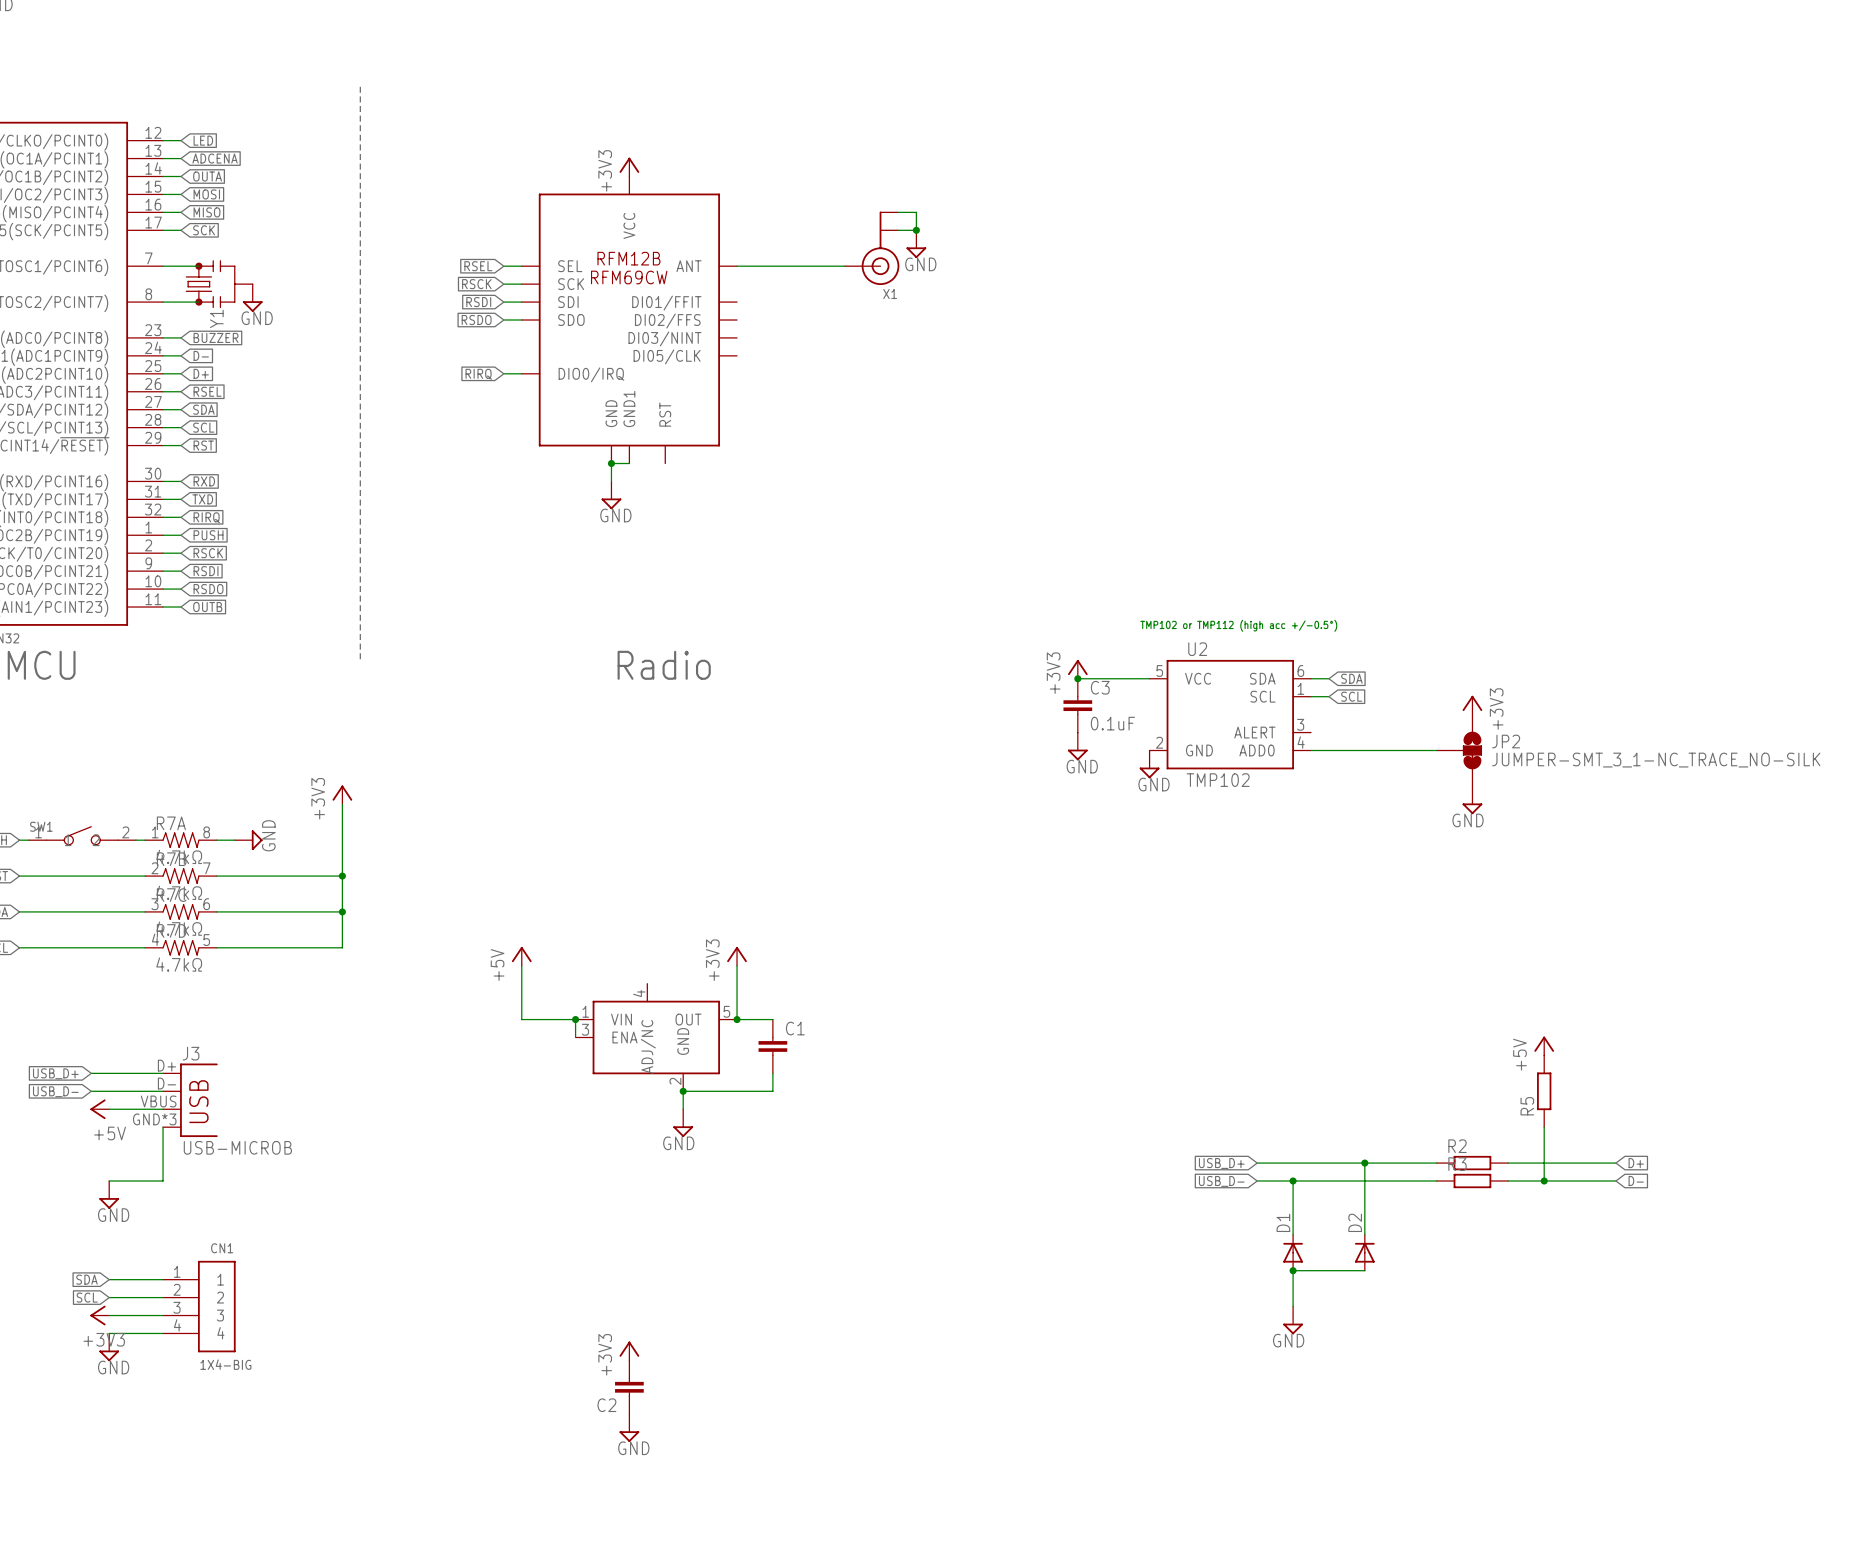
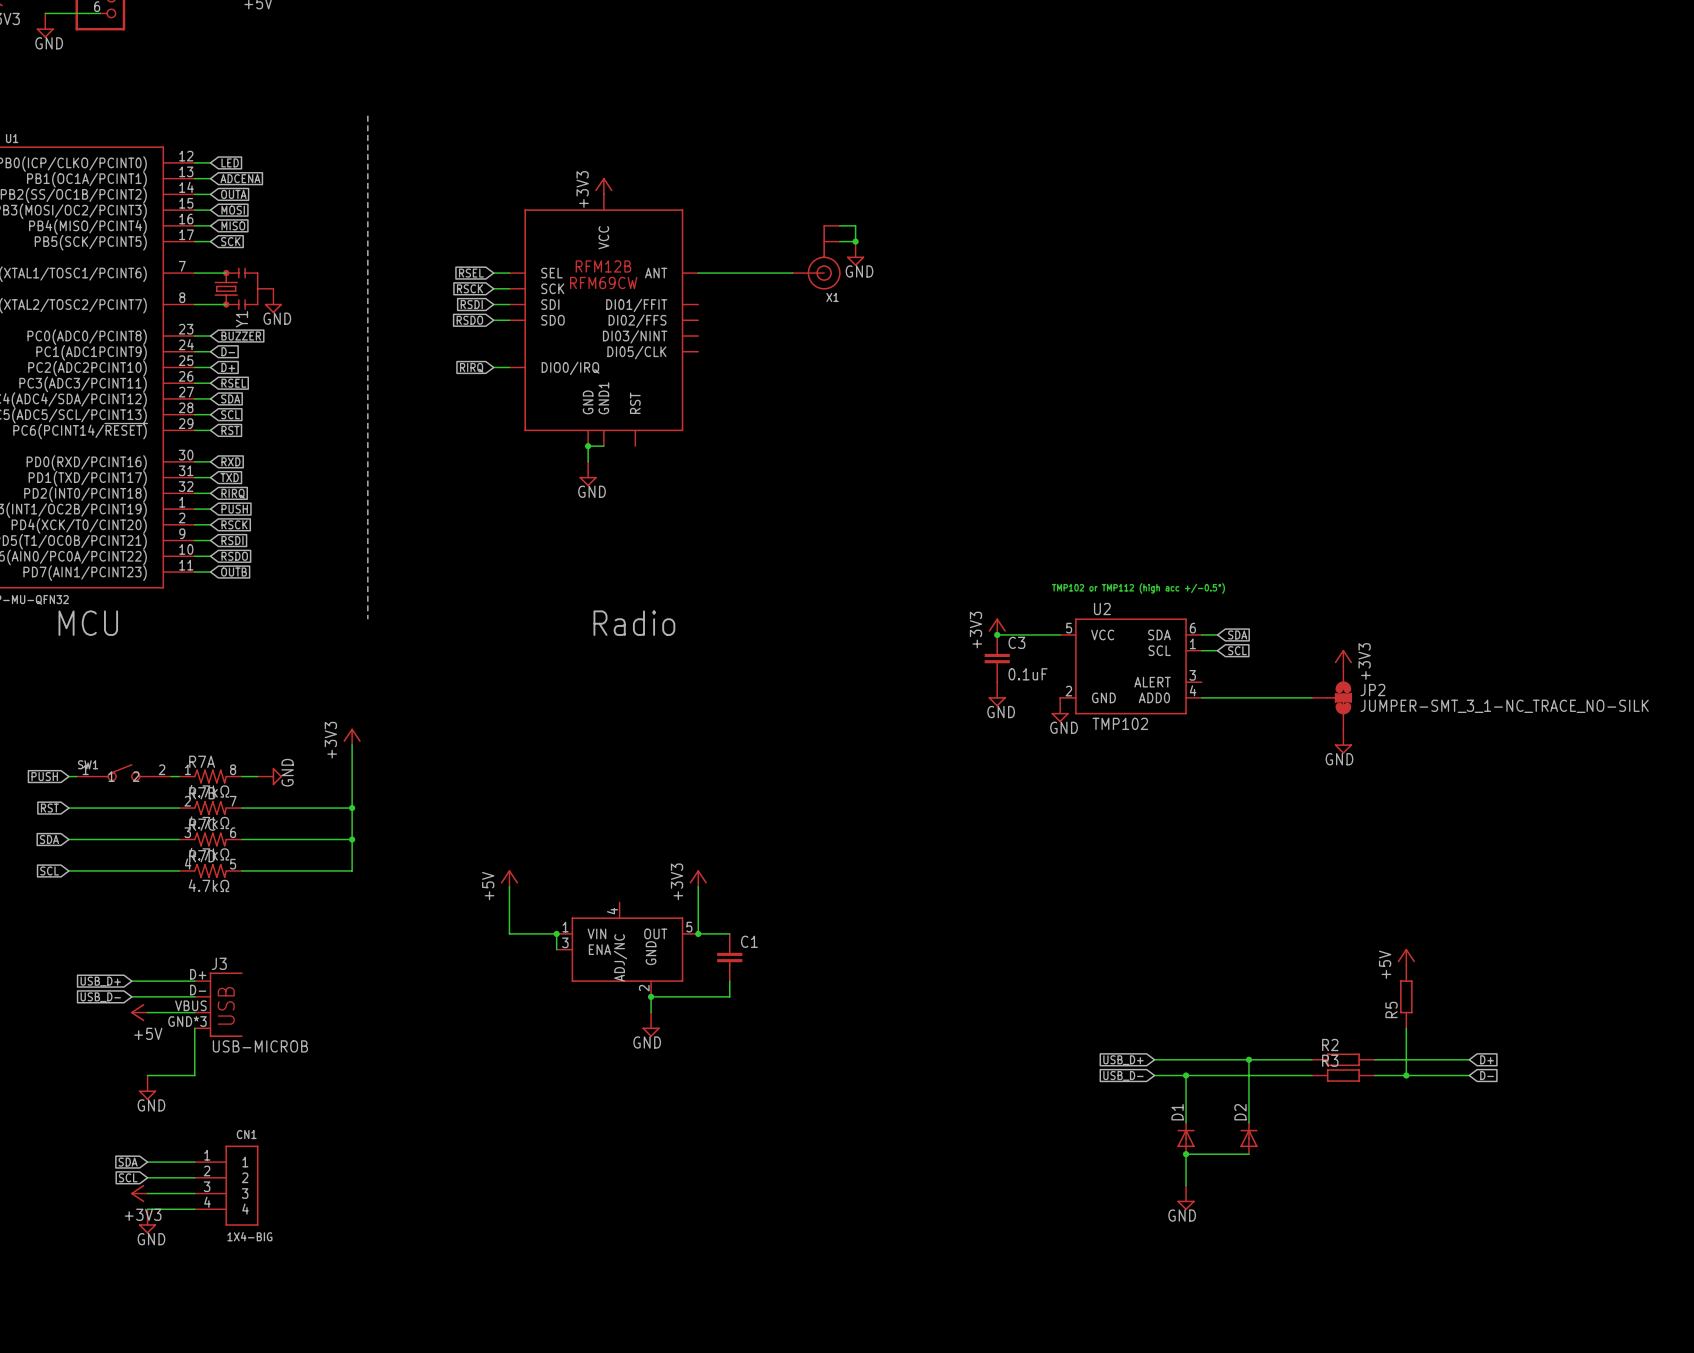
power symbol: +3V3 (629, 1350) -> none
C2: (629, 1387) -> none
power symbol: GND (629, 1428) -> none

